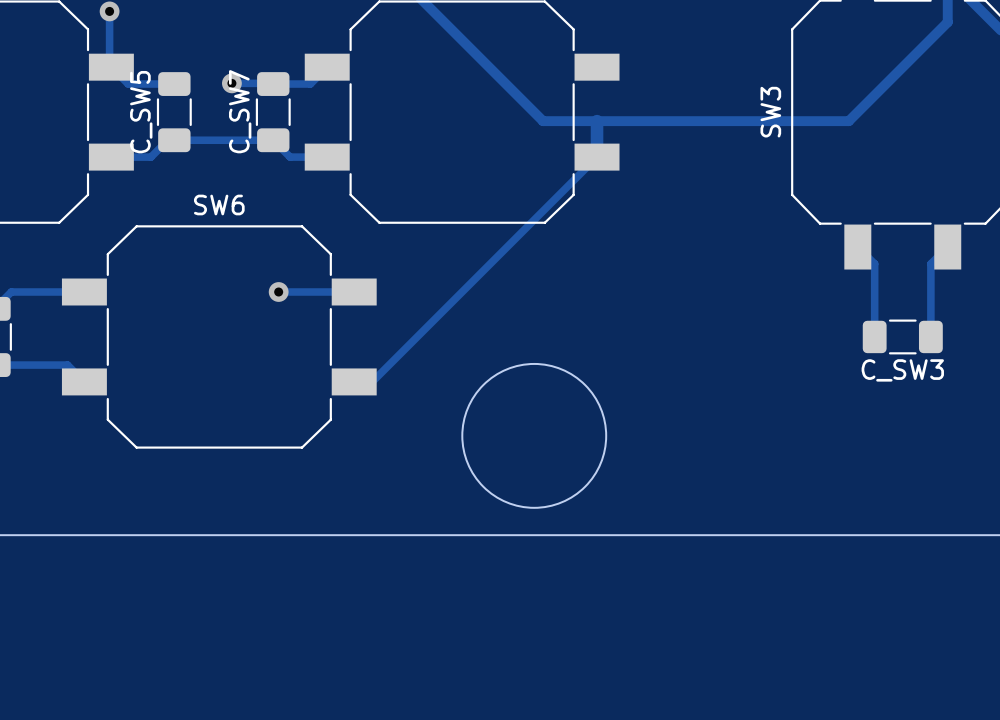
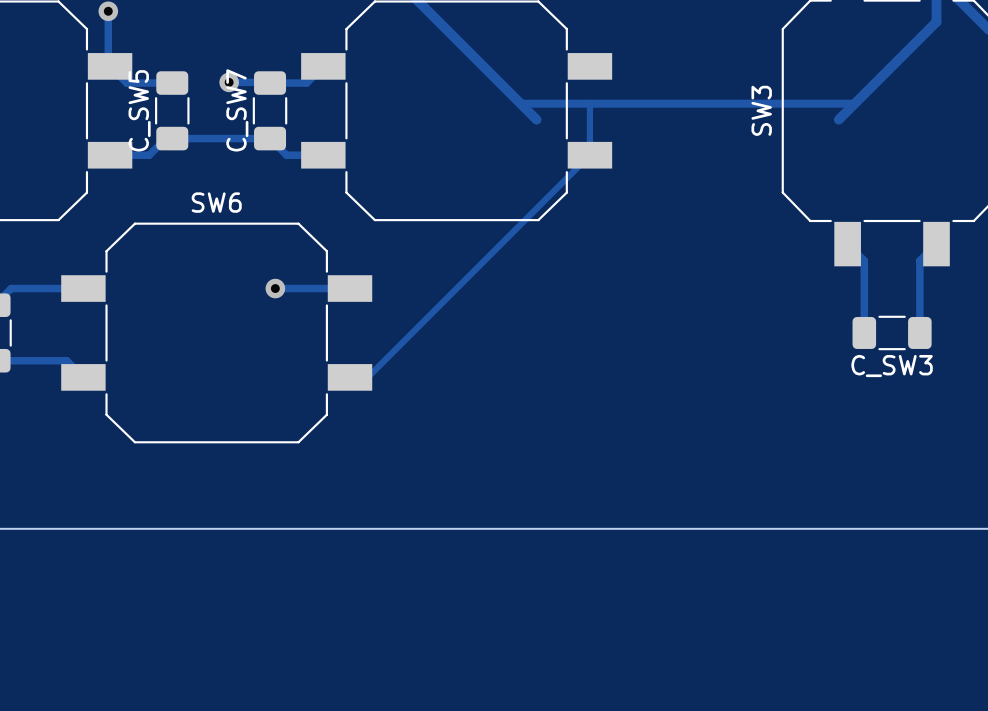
track: none -> (520, 103) (854, 103)
track: (543, 121) (848, 121) -> none
track width: thick (597, 121) (597, 157) (372, 381) (354, 381) -> thin (589, 119) (589, 155) (367, 377) (350, 377)
round board edge: [461, 363, 607, 509] -> none

